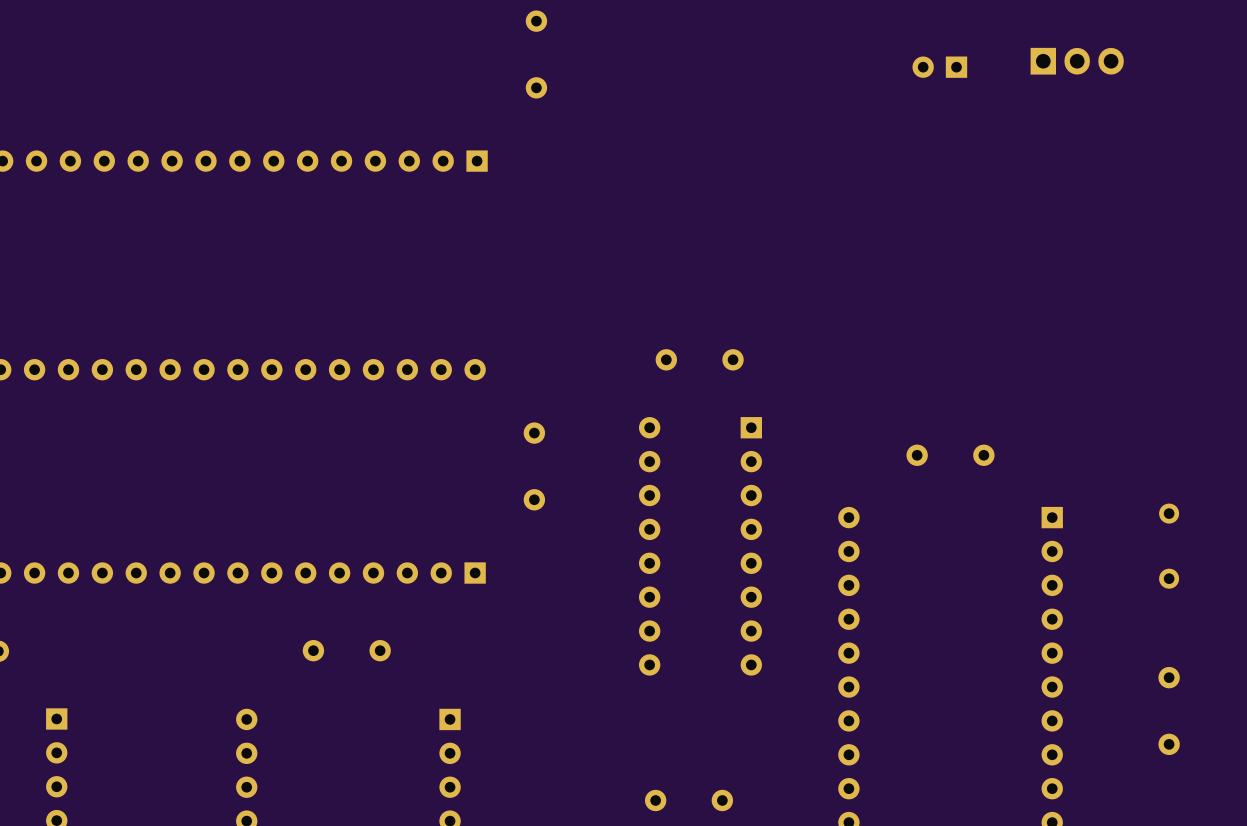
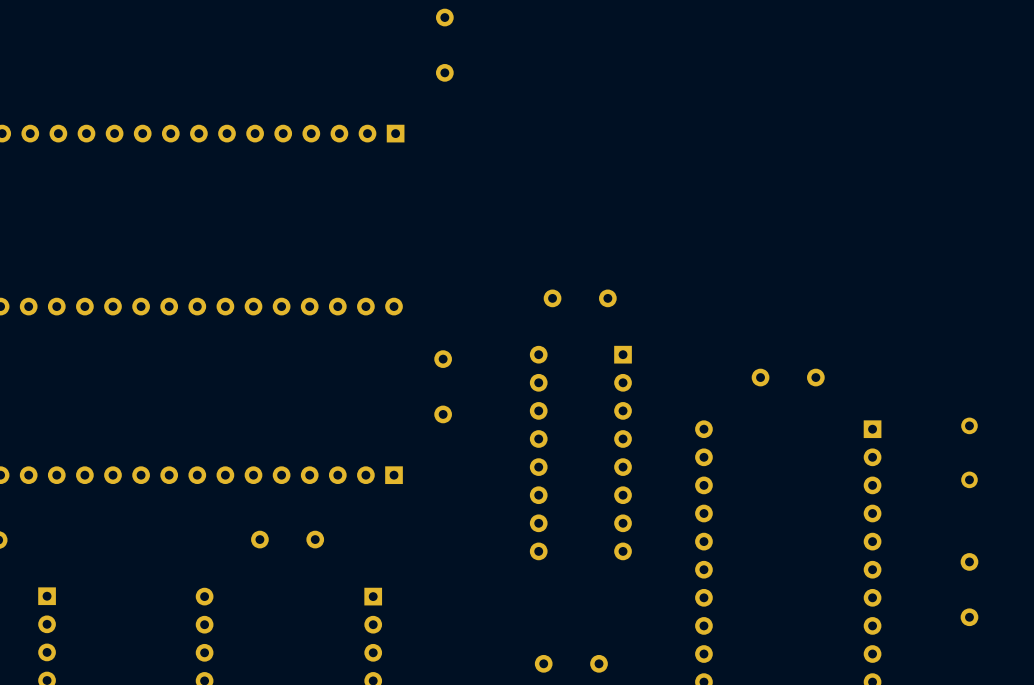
part: (1077, 61) -> none
part: (939, 67) -> none

